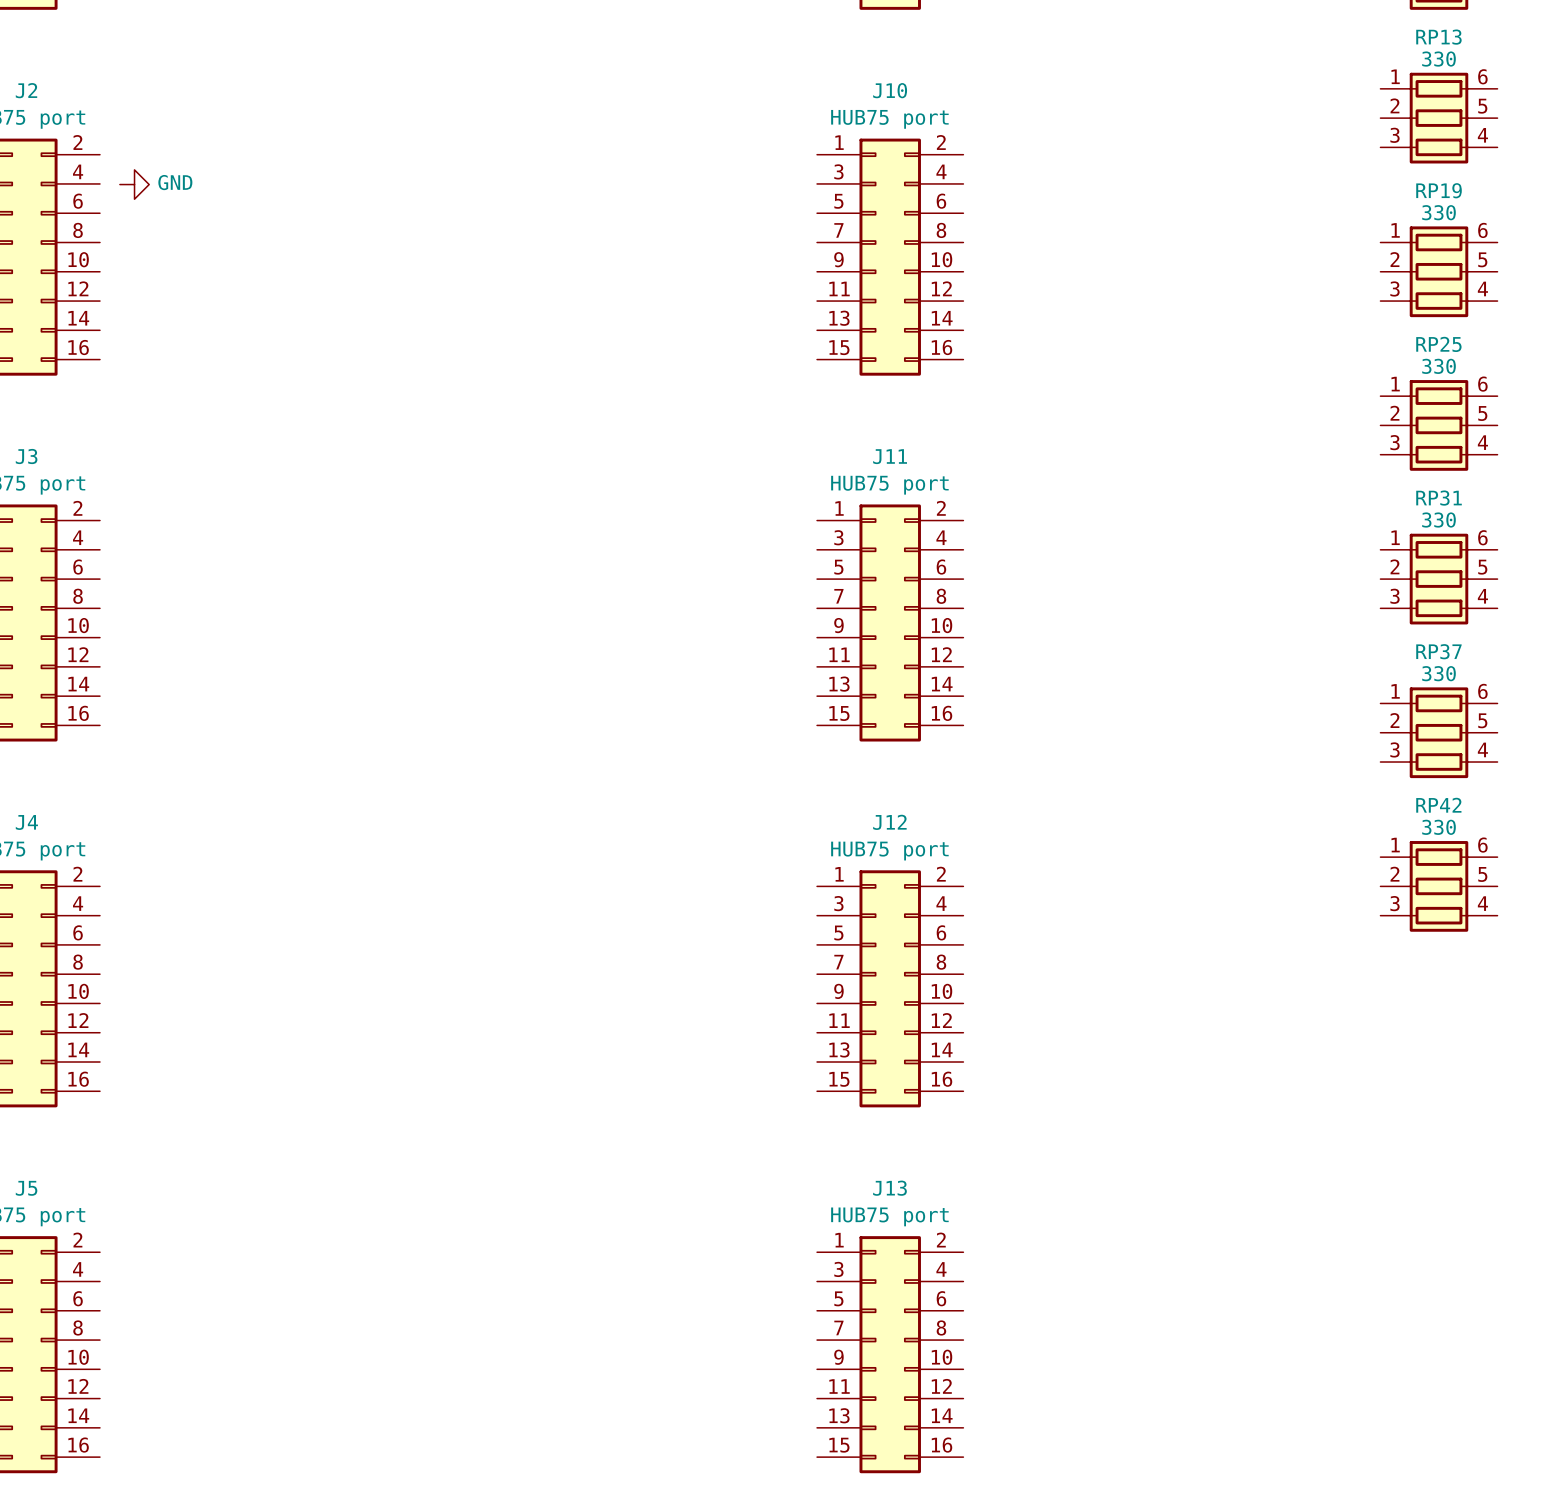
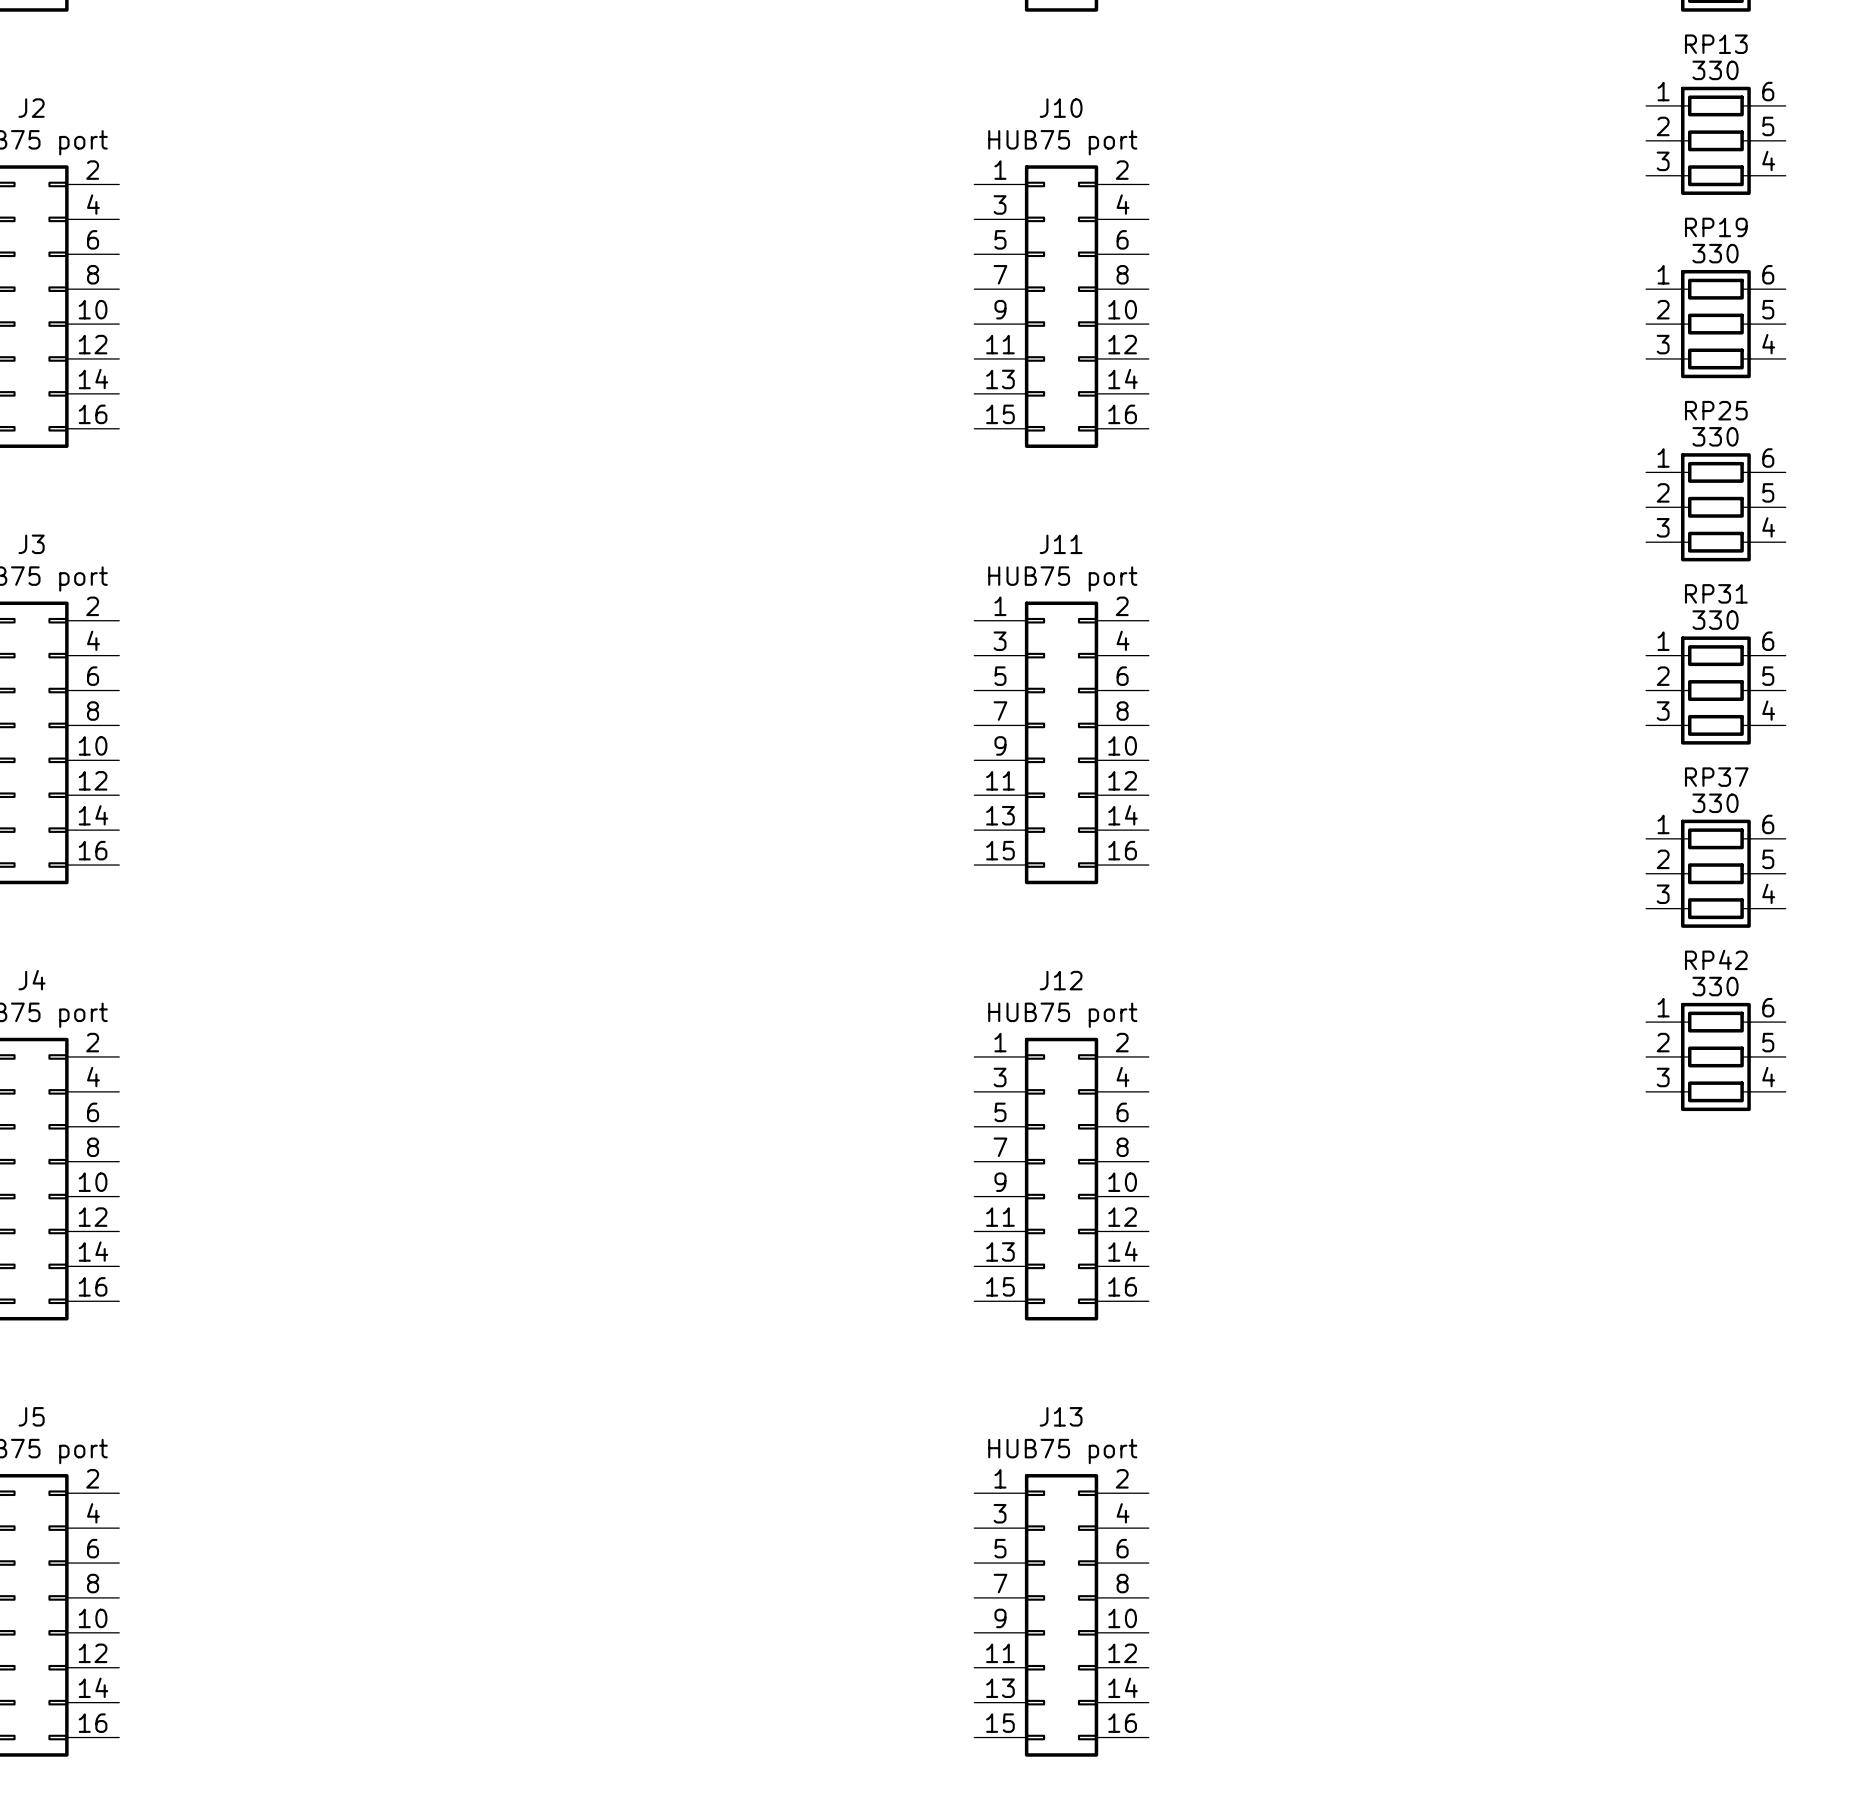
power symbol: GND (134, 184) -> none

